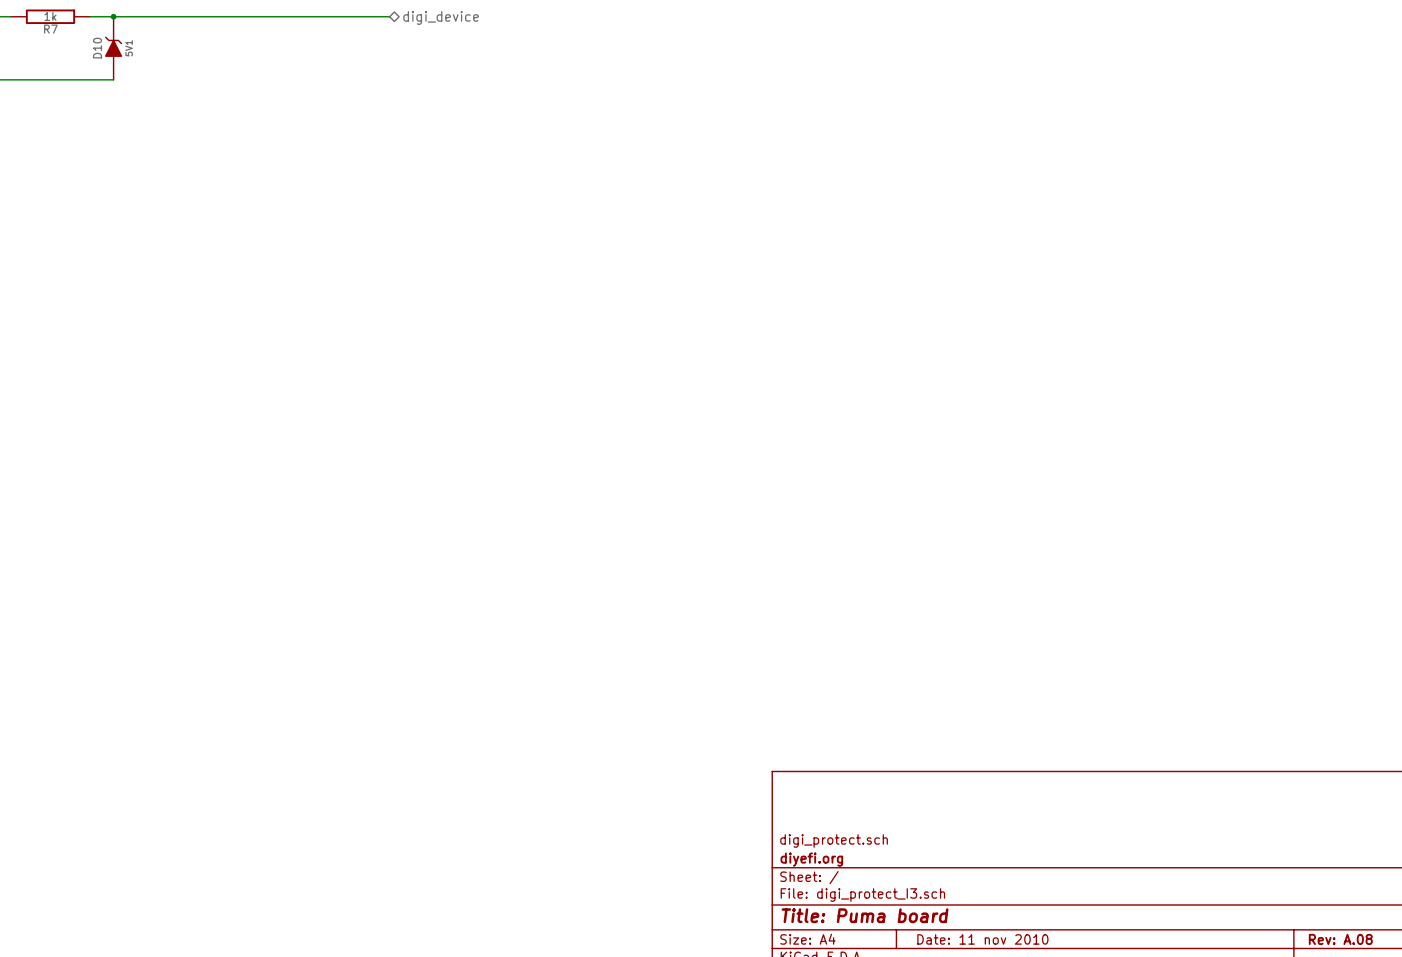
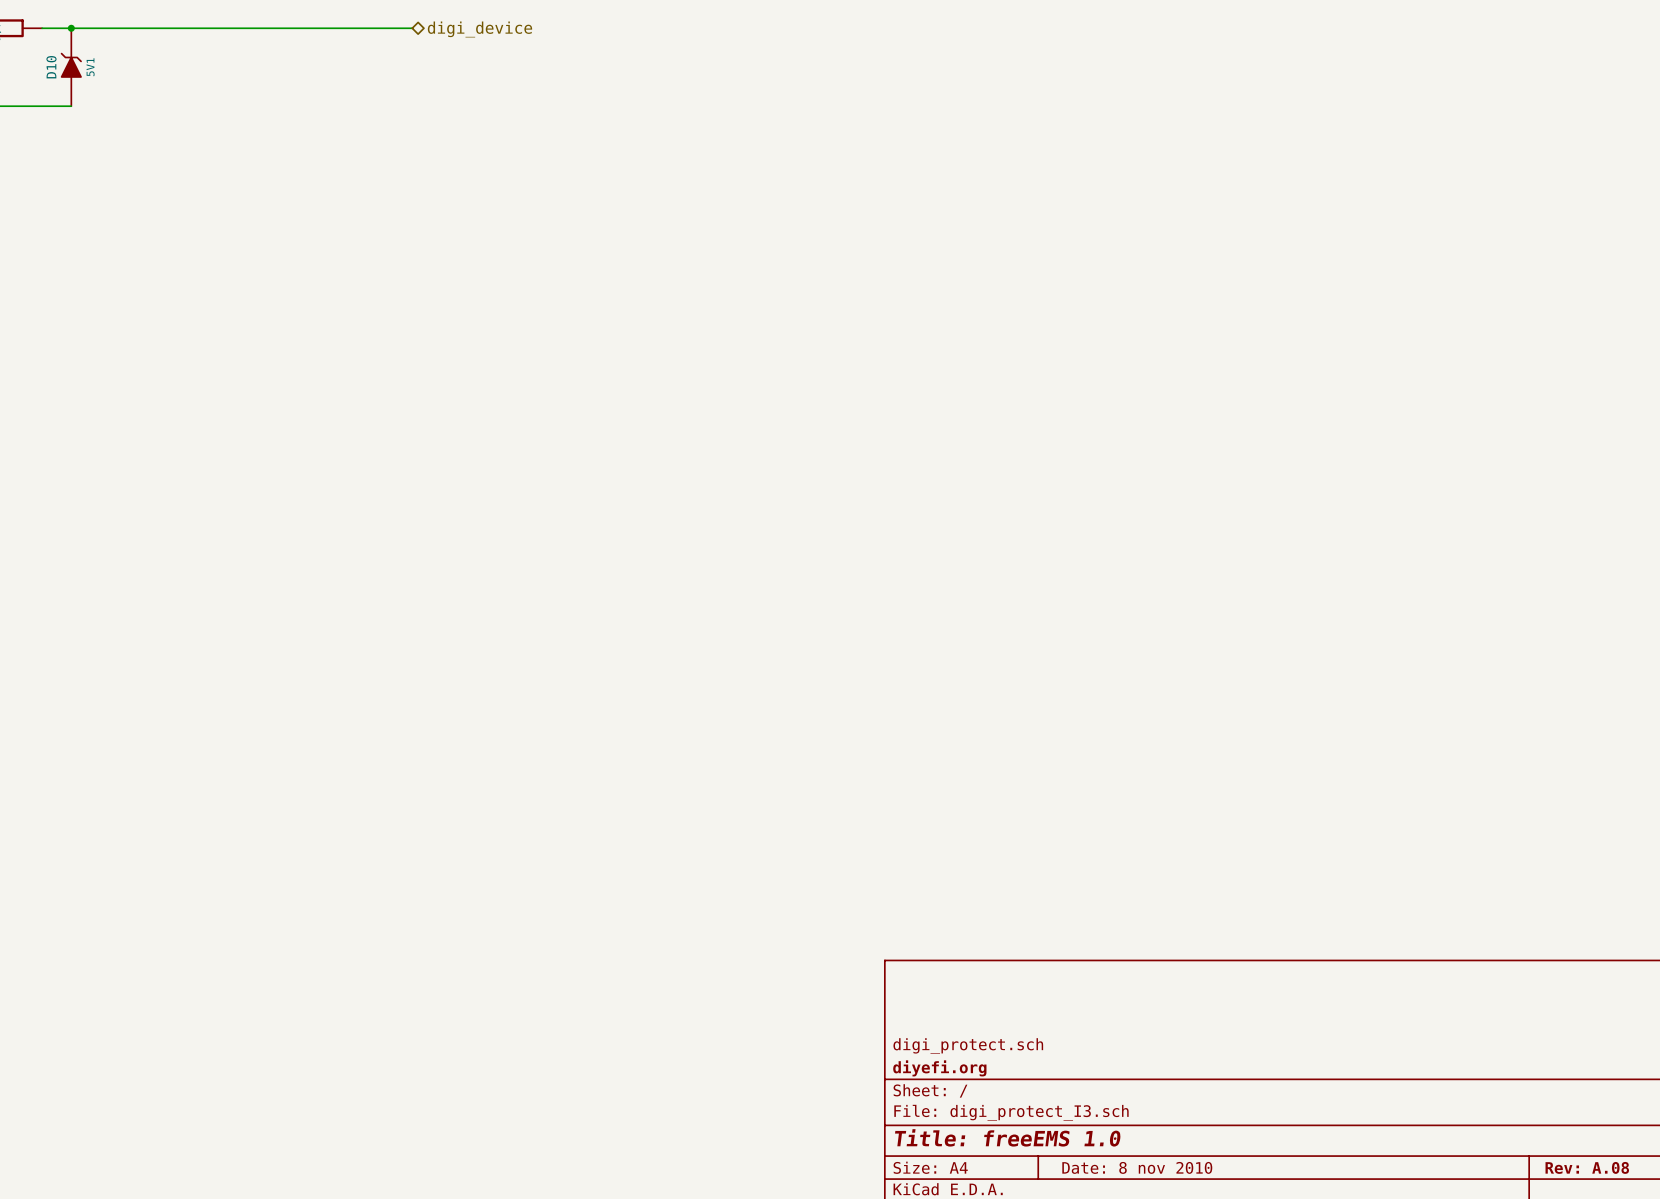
title block: Title: Puma board (865, 915) -> Title: freeEMS 1.0 (1007, 1137)
title block: Date: 11 nov 2010 (982, 939) -> Date: 8 nov 2010 (1137, 1167)

